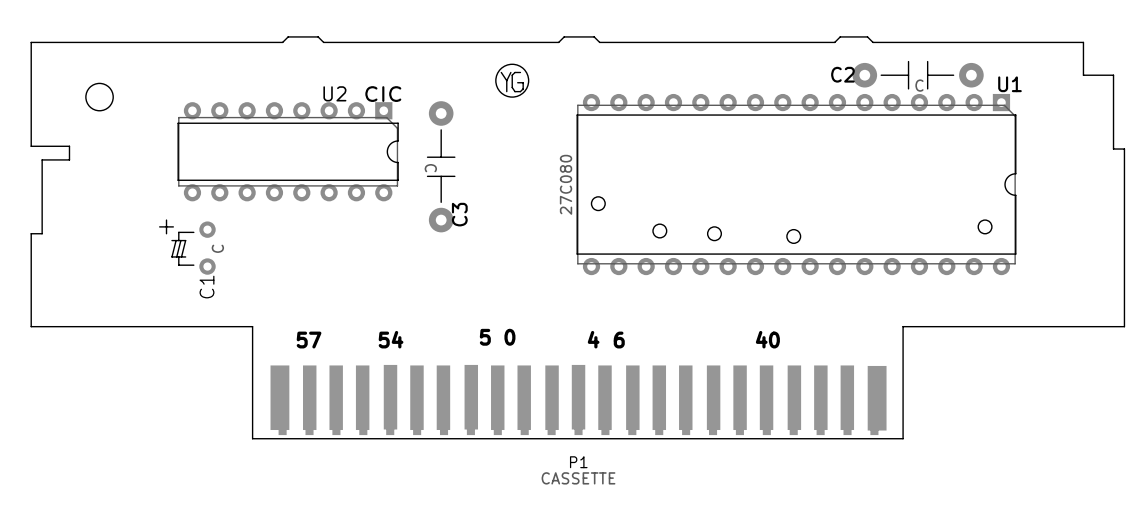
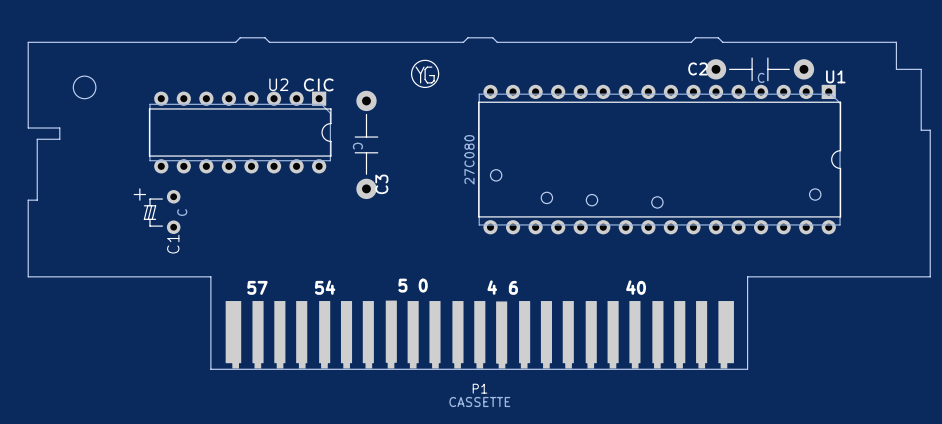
P1 footprint: [270, 364, 887, 436] -> [225, 300, 734, 369]

